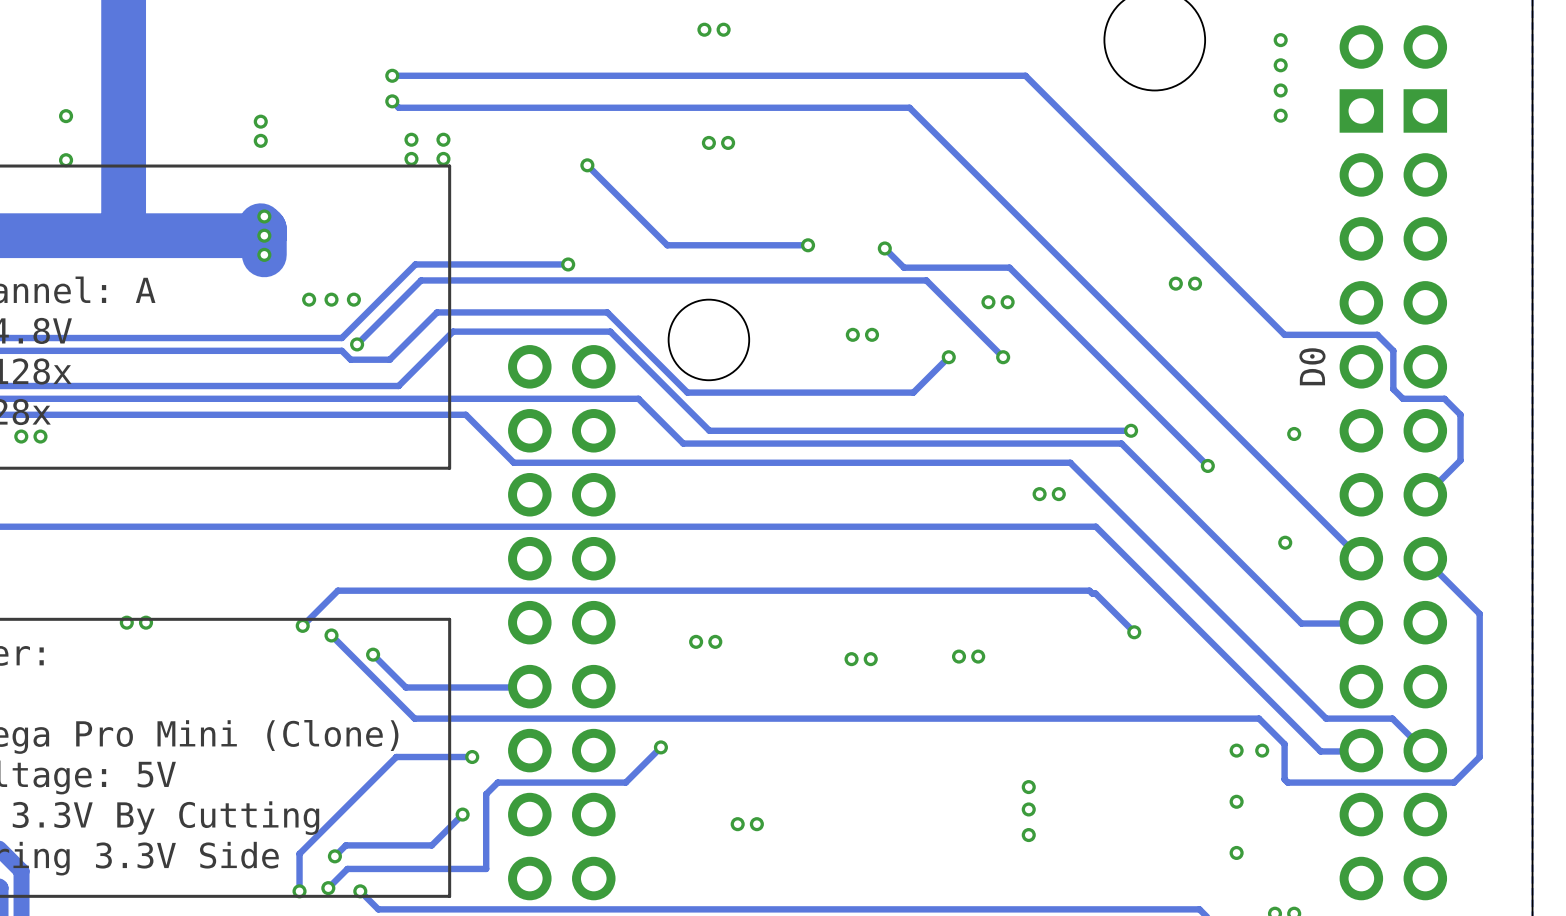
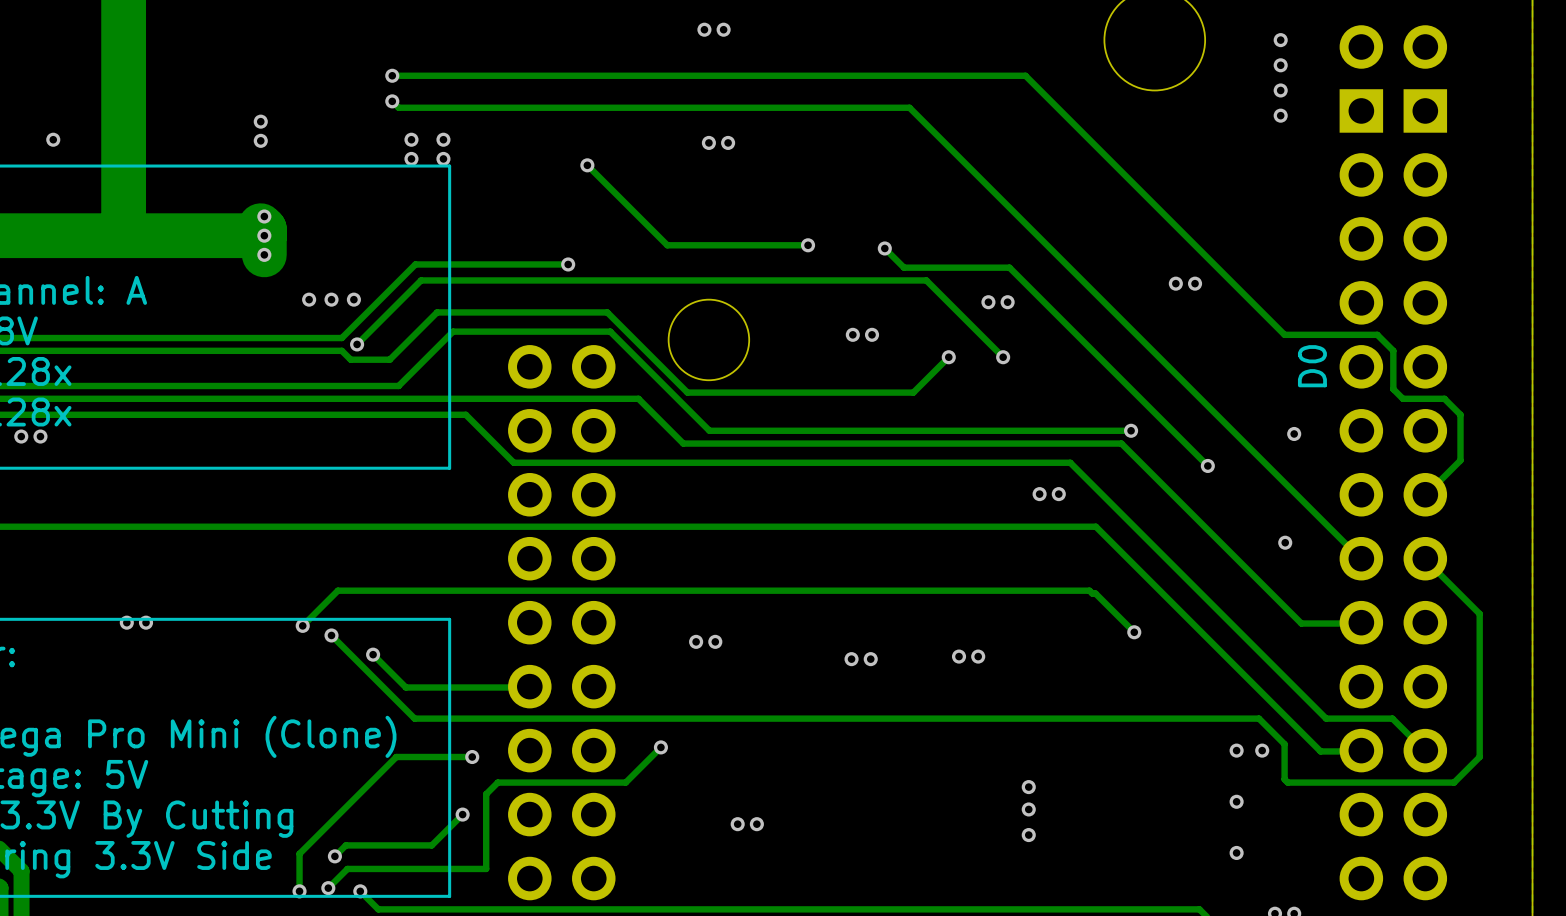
via: (66, 116) -> none
via: none -> (53, 139)
via: (66, 160) -> none

